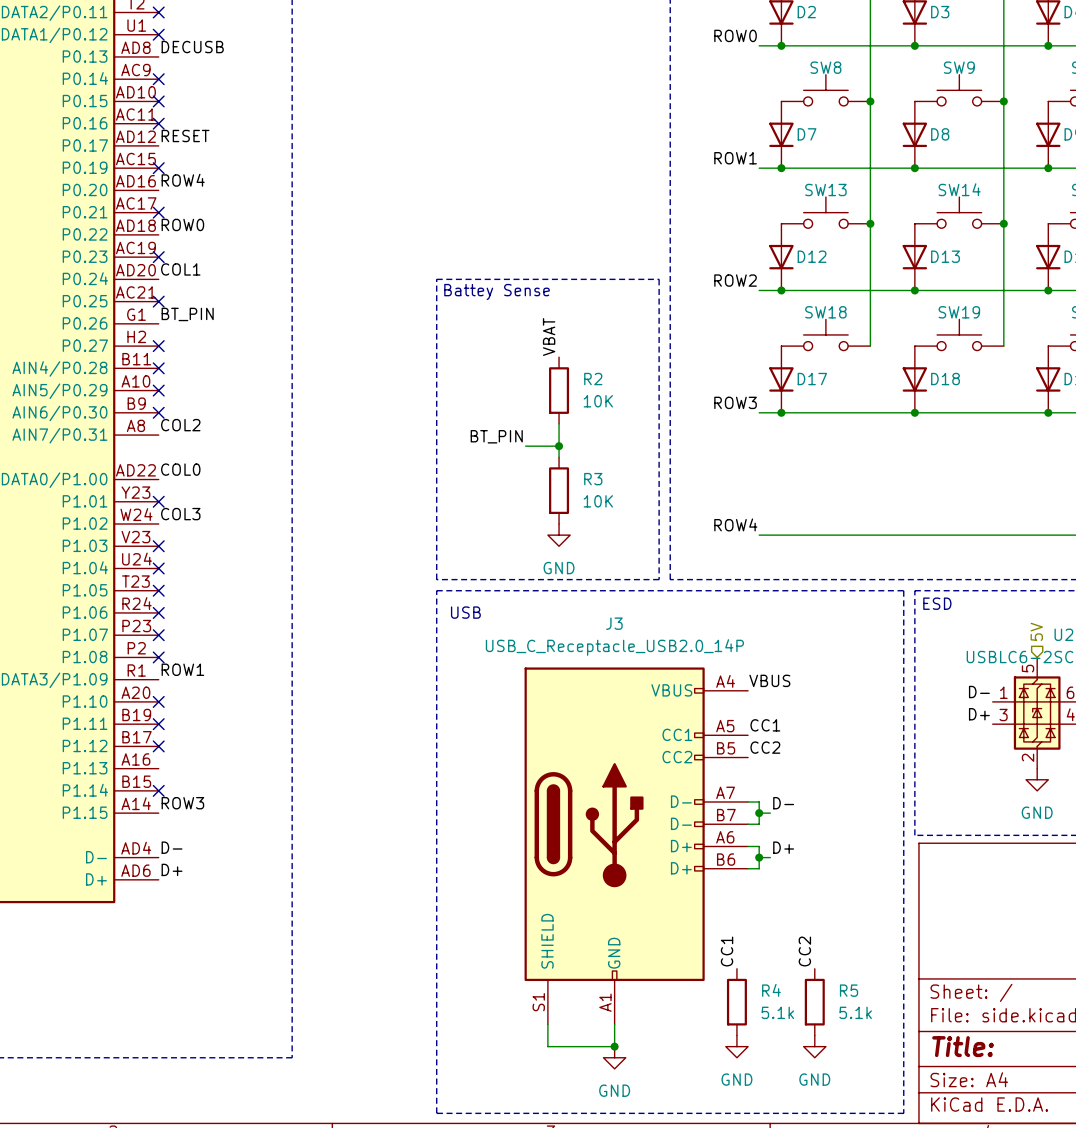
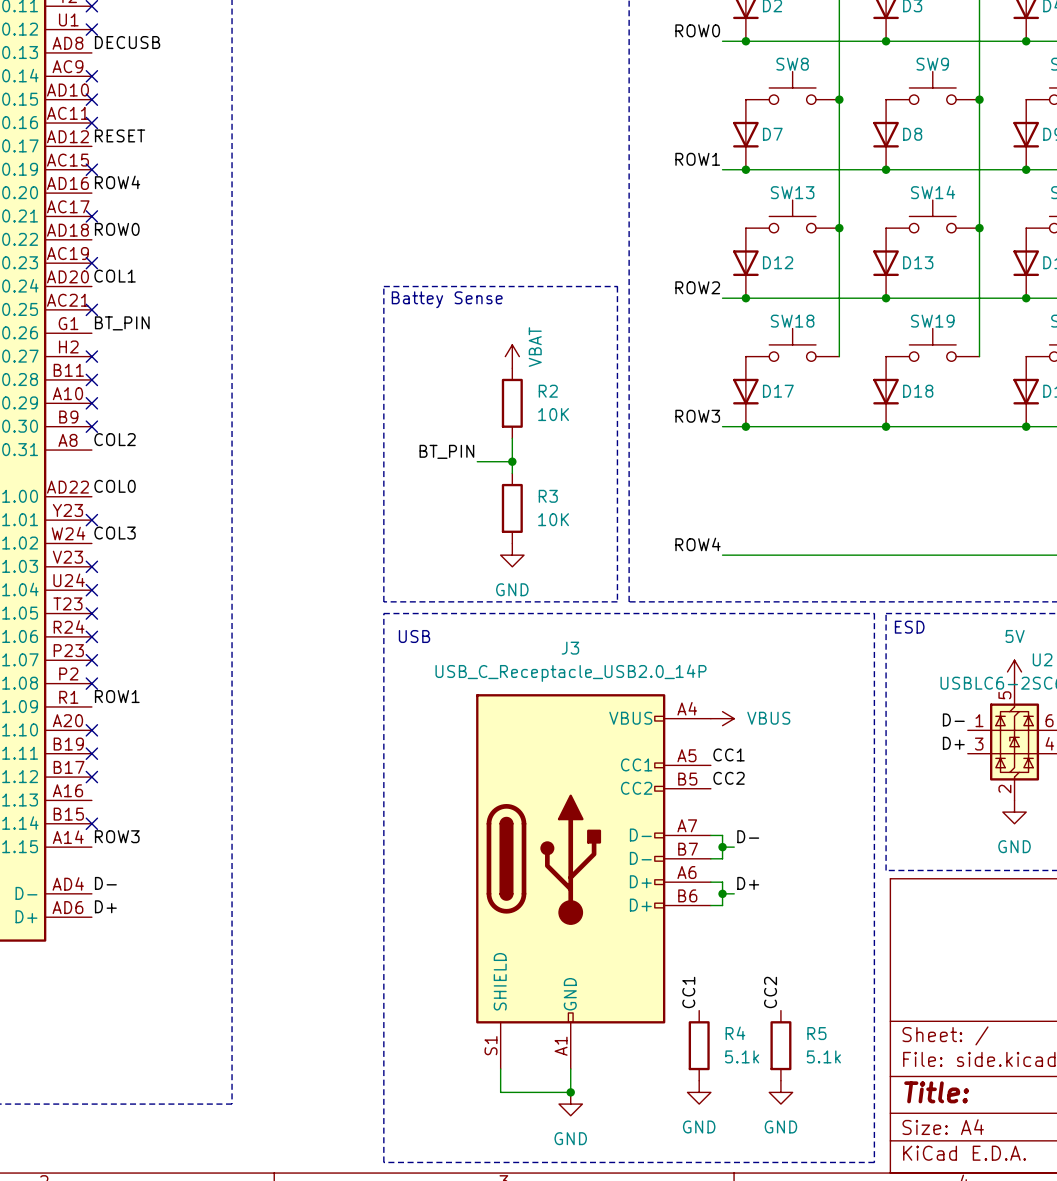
label: VBAT (549, 337) -> none
power symbol: none -> VBAT (512, 356)
hierarchical label: 5V (1036, 631) -> none
power symbol: none -> 5V (1014, 671)
label: VBUS (769, 680) -> none
power symbol: none -> VBUS (722, 718)

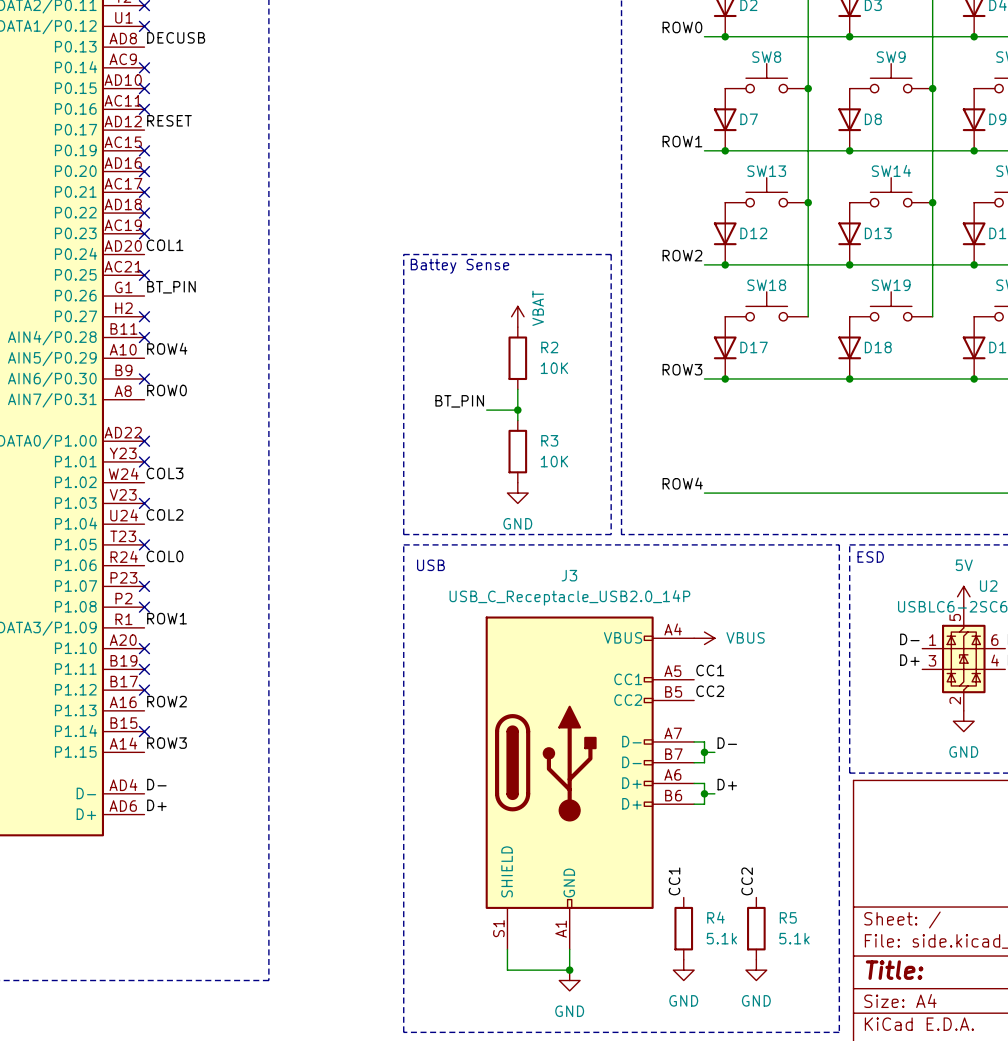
label position: ROW4 (117, 182) -> ROW4 (167, 348)
no-connect mark: none -> (144, 171)
label: ROW0 (117, 229) -> none
no-connect mark: none -> (144, 213)
no-connect mark: (91, 403) -> none
label: COL2 (115, 439) -> ROW0 (167, 390)
label position: COL0 (115, 486) -> COL0 (165, 556)
no-connect mark: none -> (144, 441)
label: none -> COL2 (165, 514)
no-connect mark: (91, 590) -> none
no-connect mark: (91, 636) -> none
label: none -> ROW2 (167, 701)

